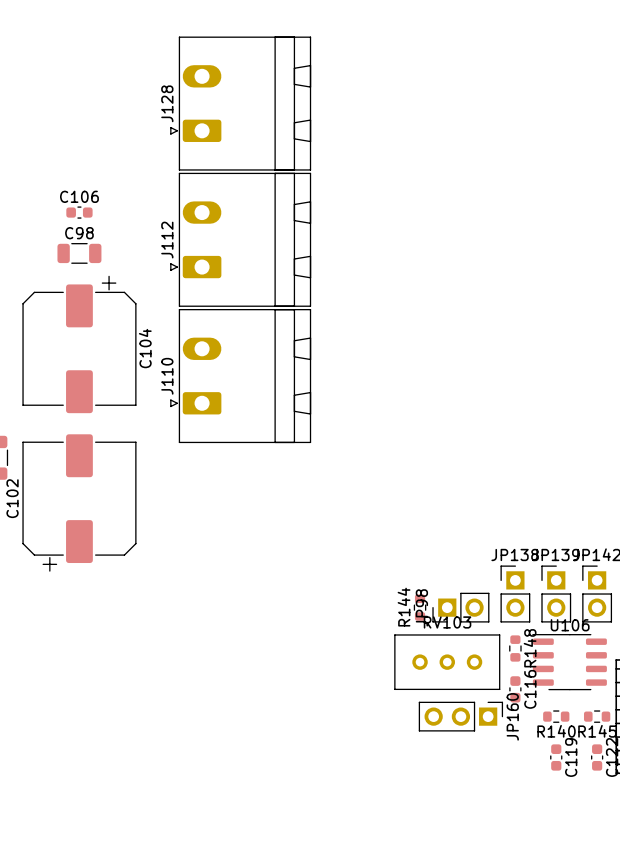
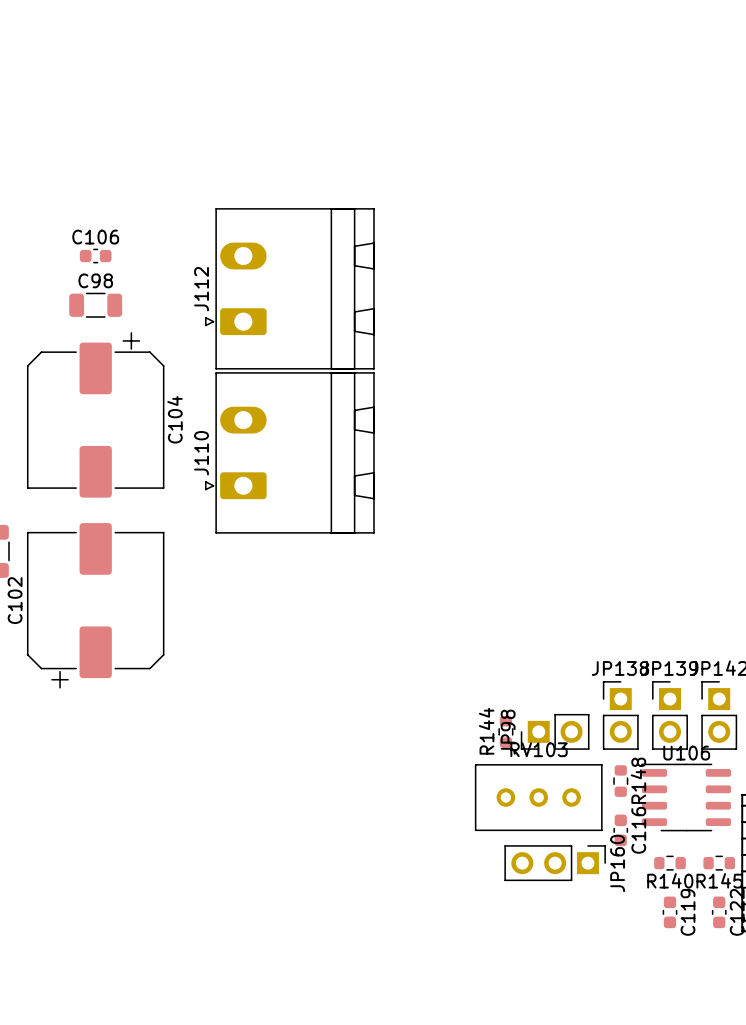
J128: (240, 103) -> none

